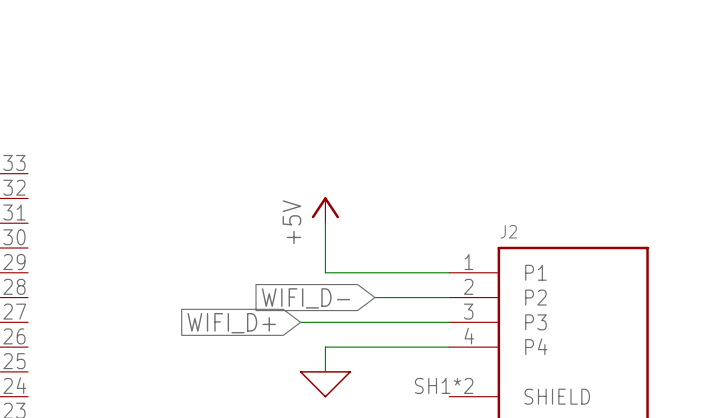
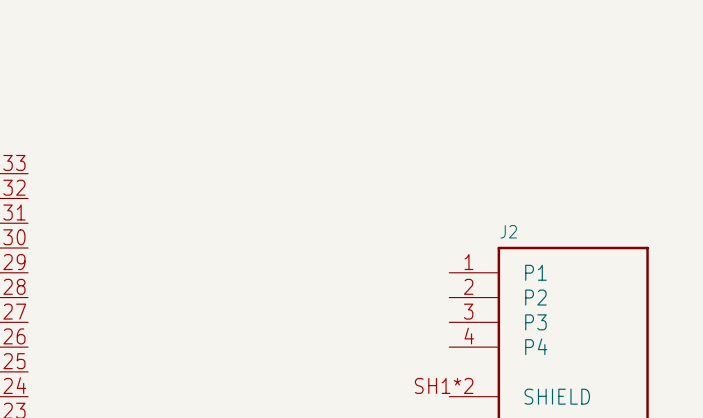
power symbol: +5V (325, 210) -> none
wire: (325, 223) (325, 272) (449, 272) -> none
wire: (374, 297) (449, 297) -> none
global label: WIFI_D- (306, 298) -> none
wire: (300, 322) (449, 322) -> none
global label: WIFI_D+ (231, 323) -> none
wire: (449, 347) (325, 347) (325, 371) -> none
power symbol: (325, 384) -> none

